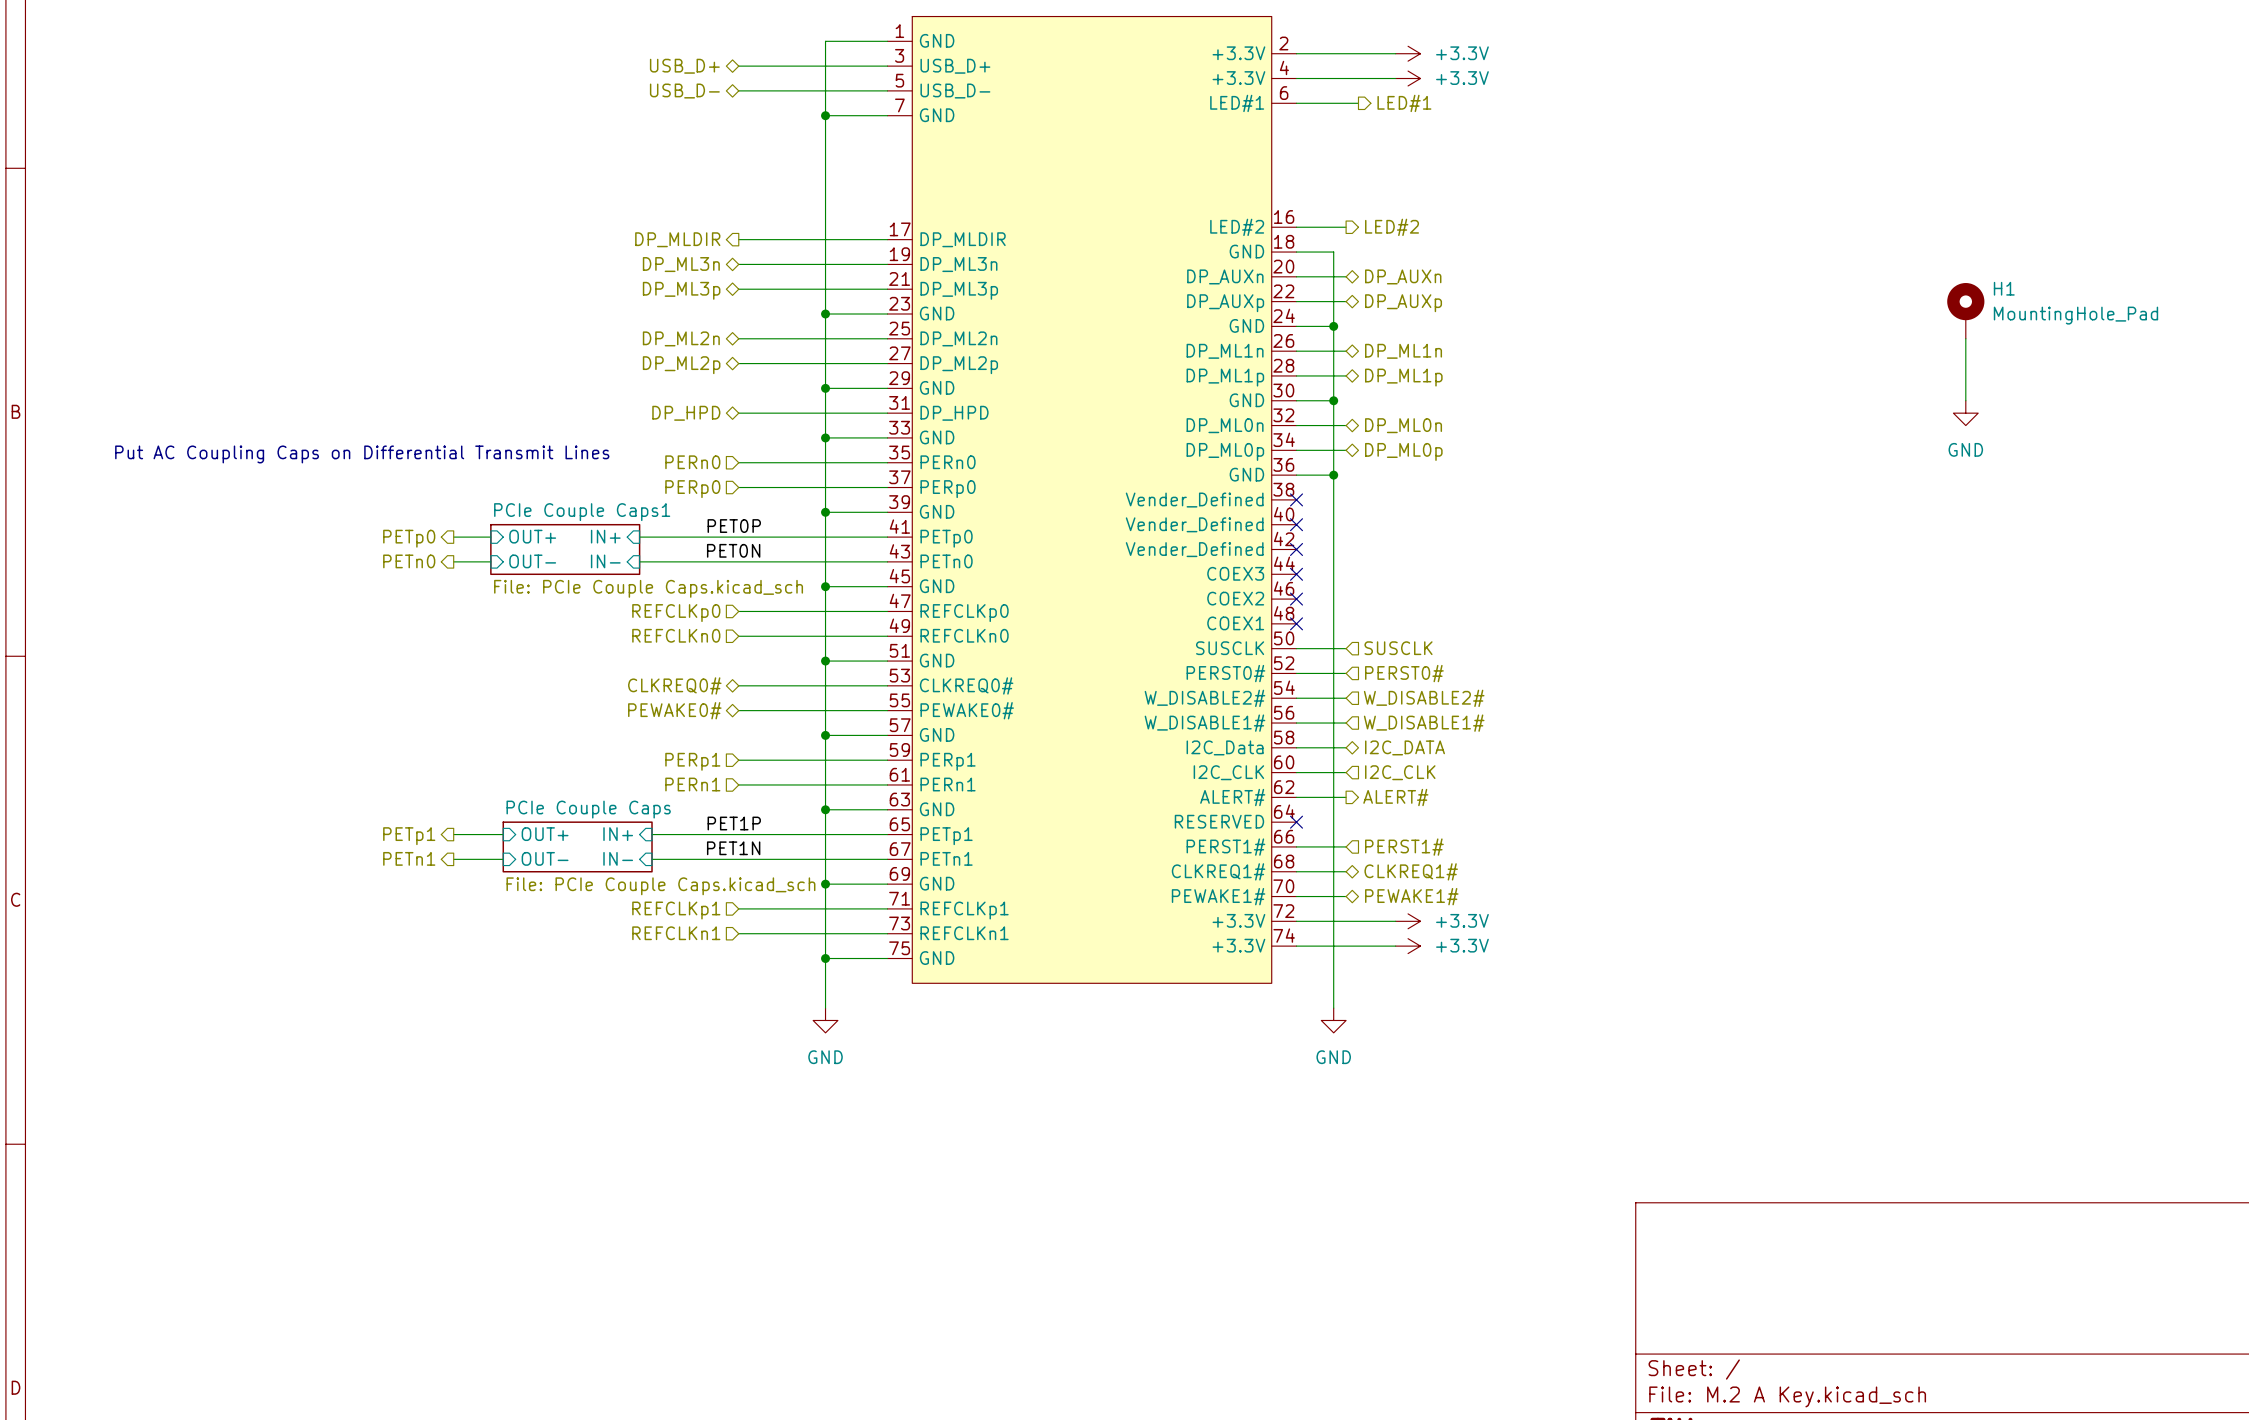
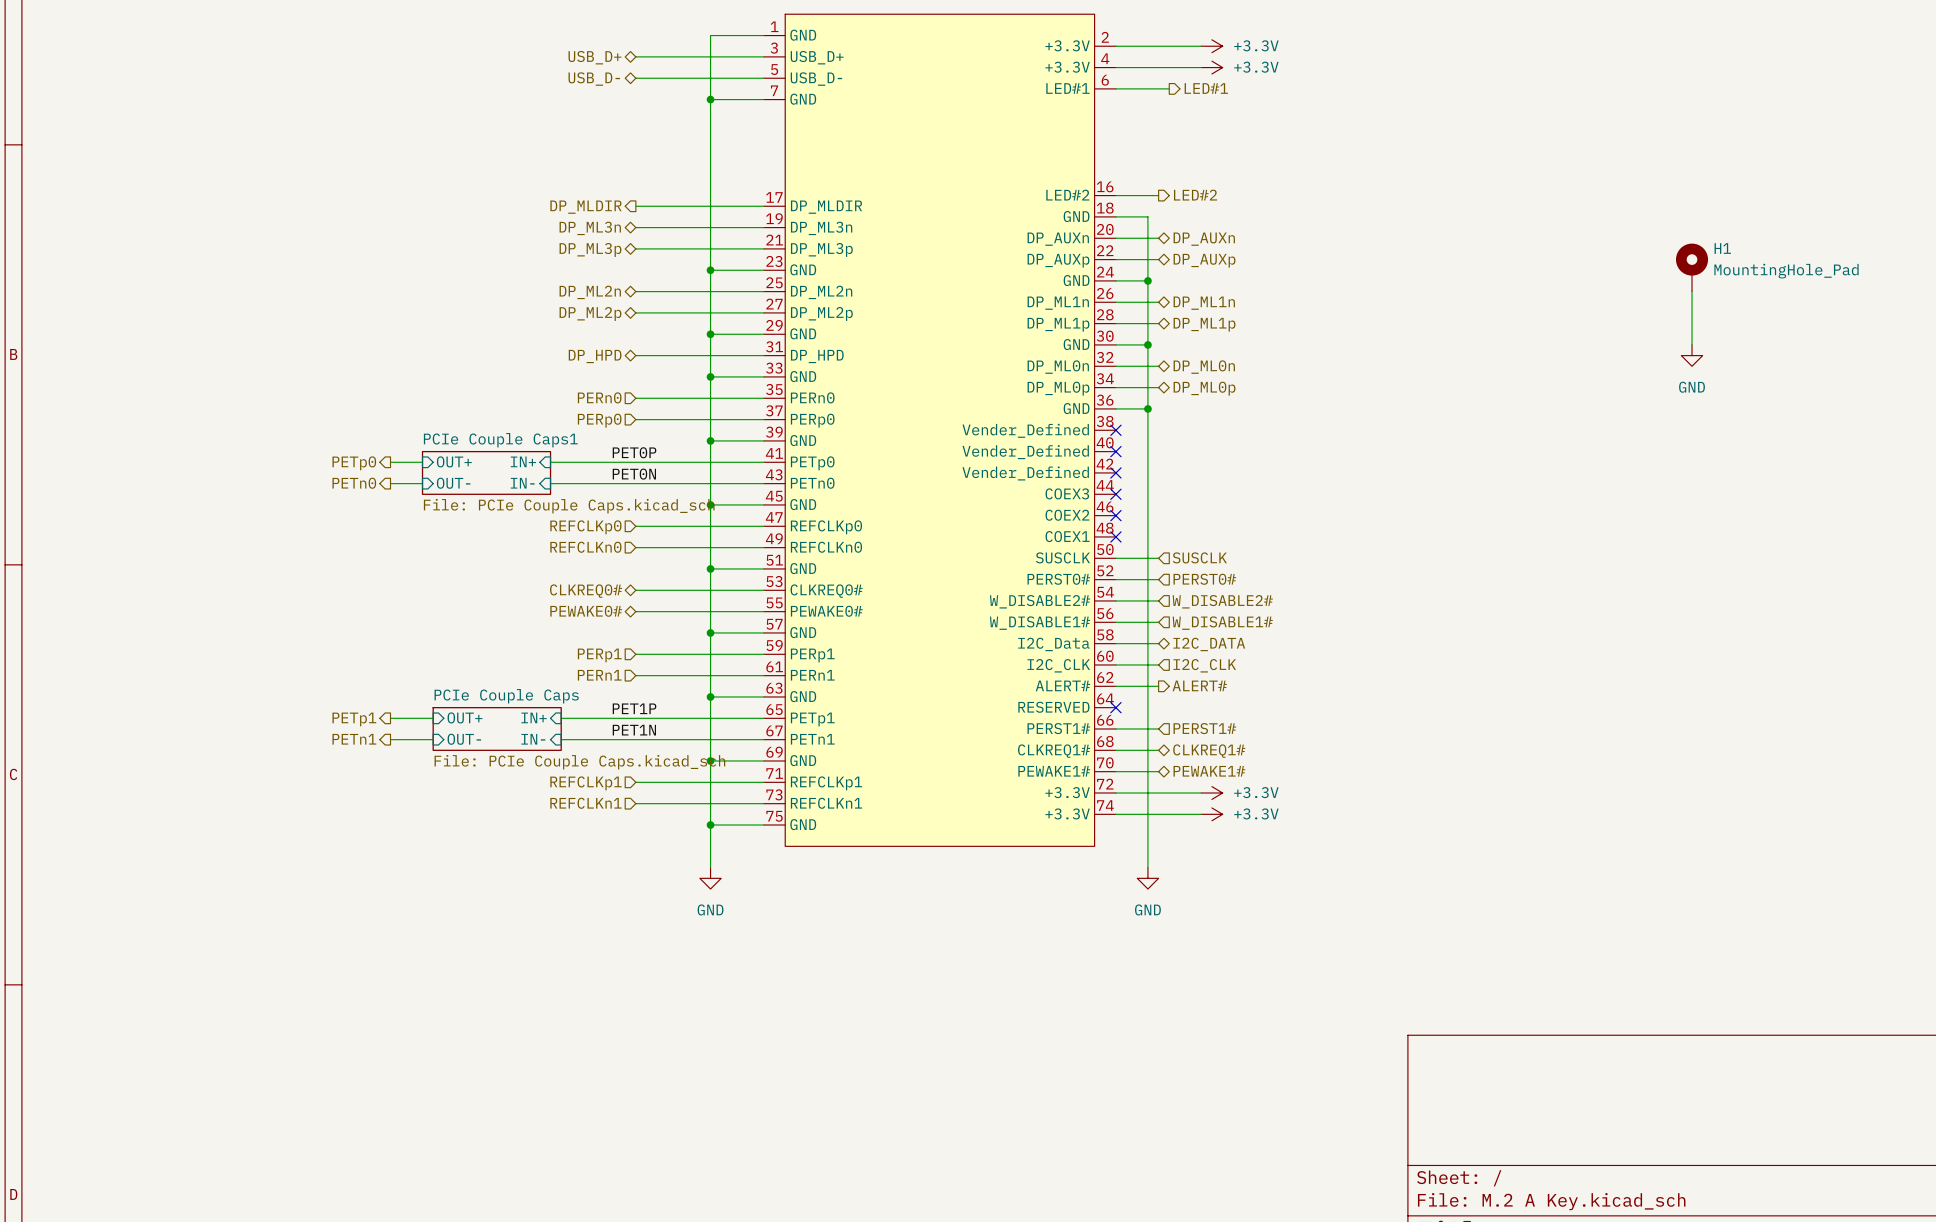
text: Put AC Coupling Caps on Differential Transmit Lines (362, 454) -> none

